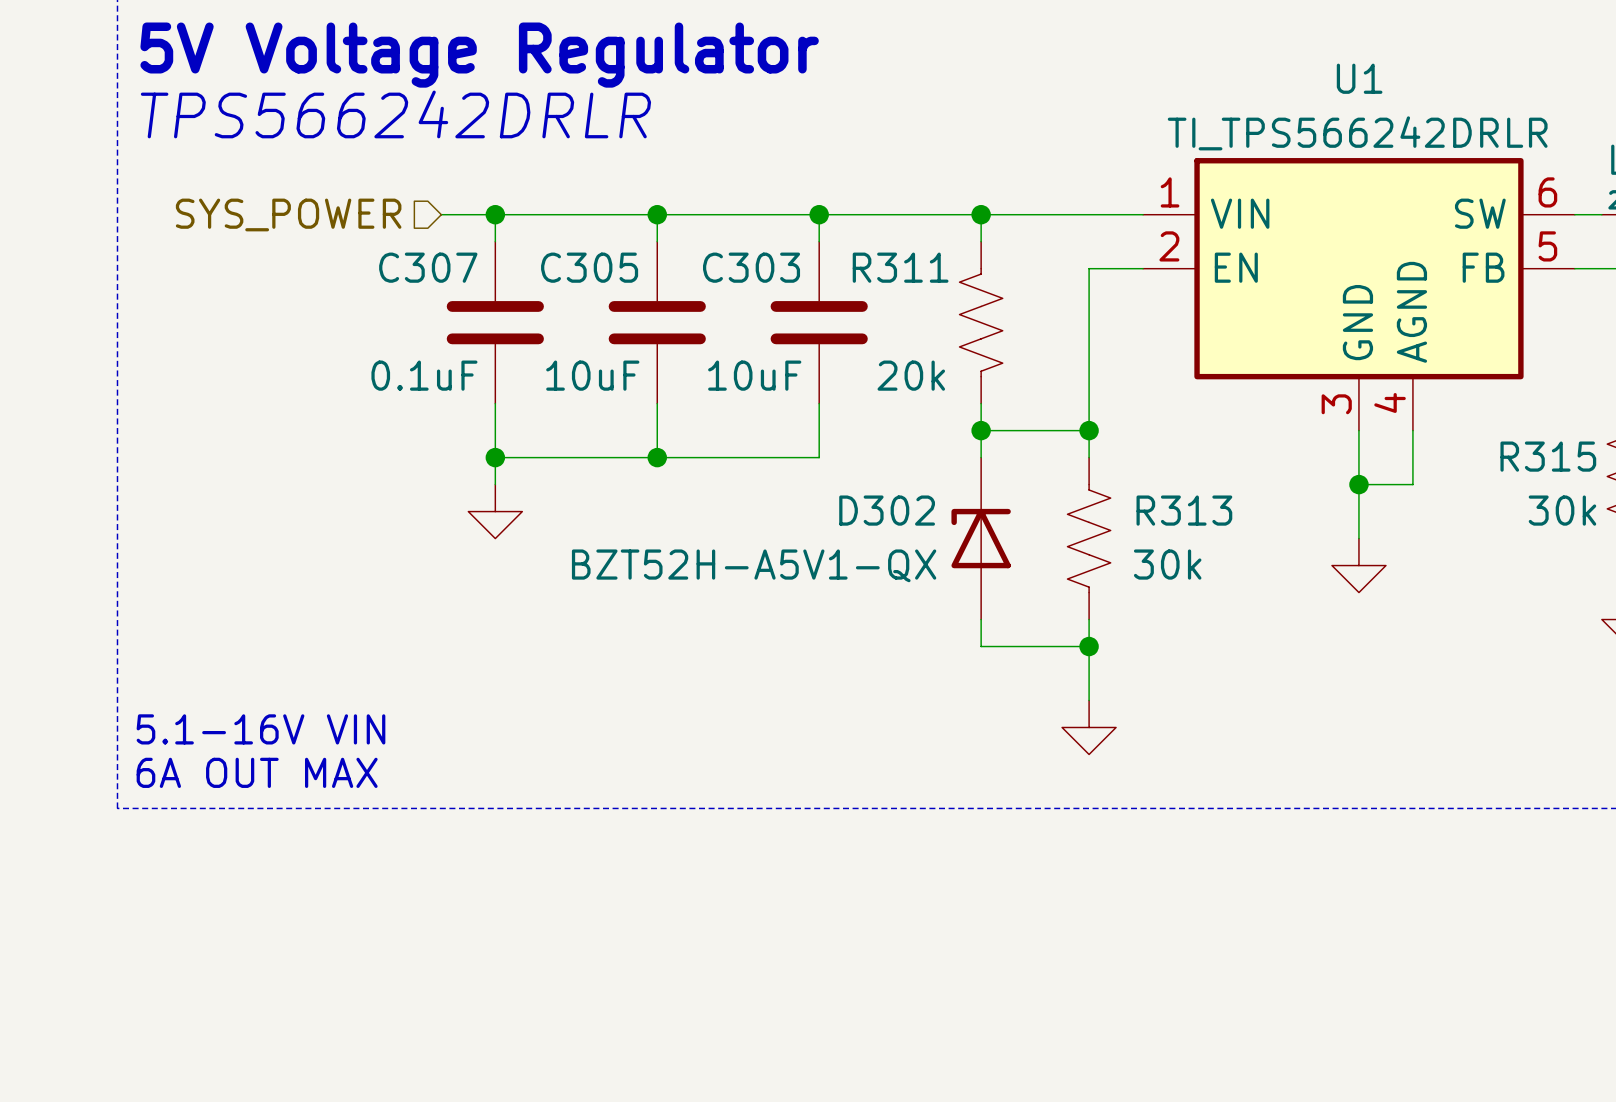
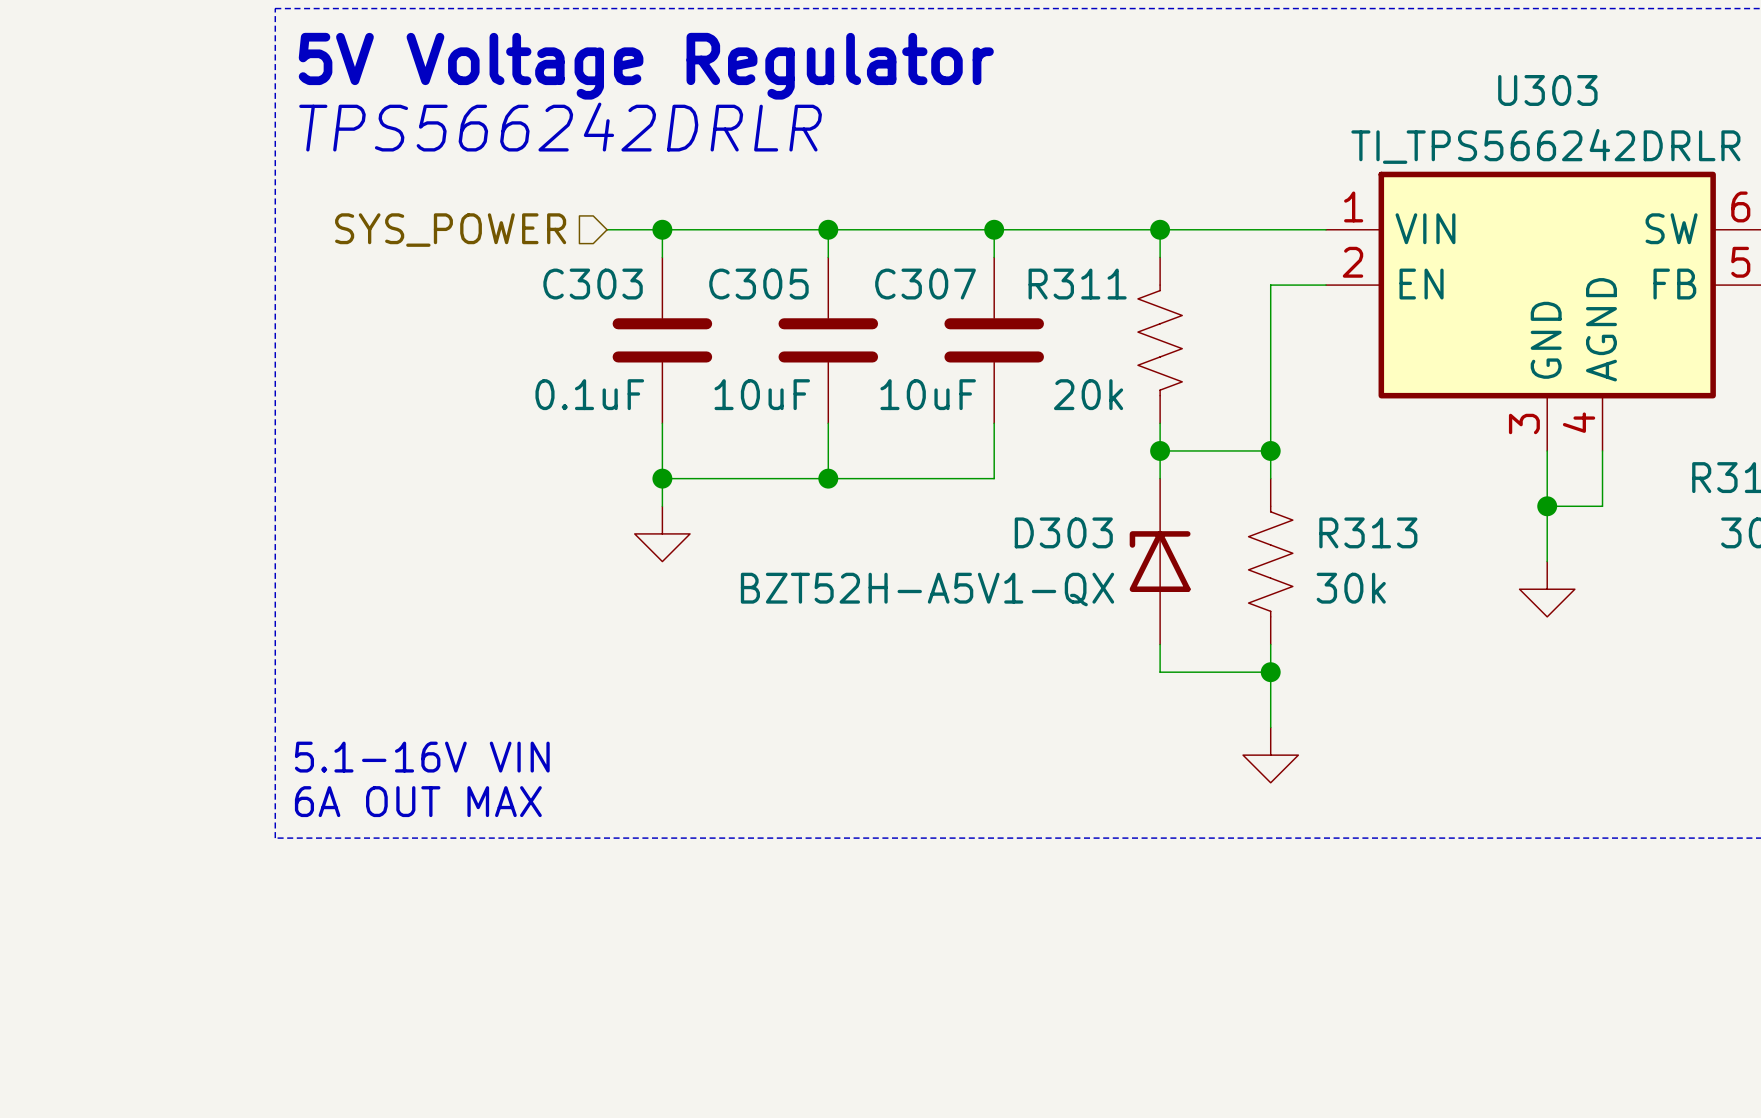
U1 name: U1 (1359, 78) -> U303 (1547, 90)
C307 name: C307 (428, 267) -> C303 (593, 284)
C303 name: C303 (751, 267) -> C307 (925, 284)
D302 name: D302 (887, 510) -> D303 (1063, 532)

